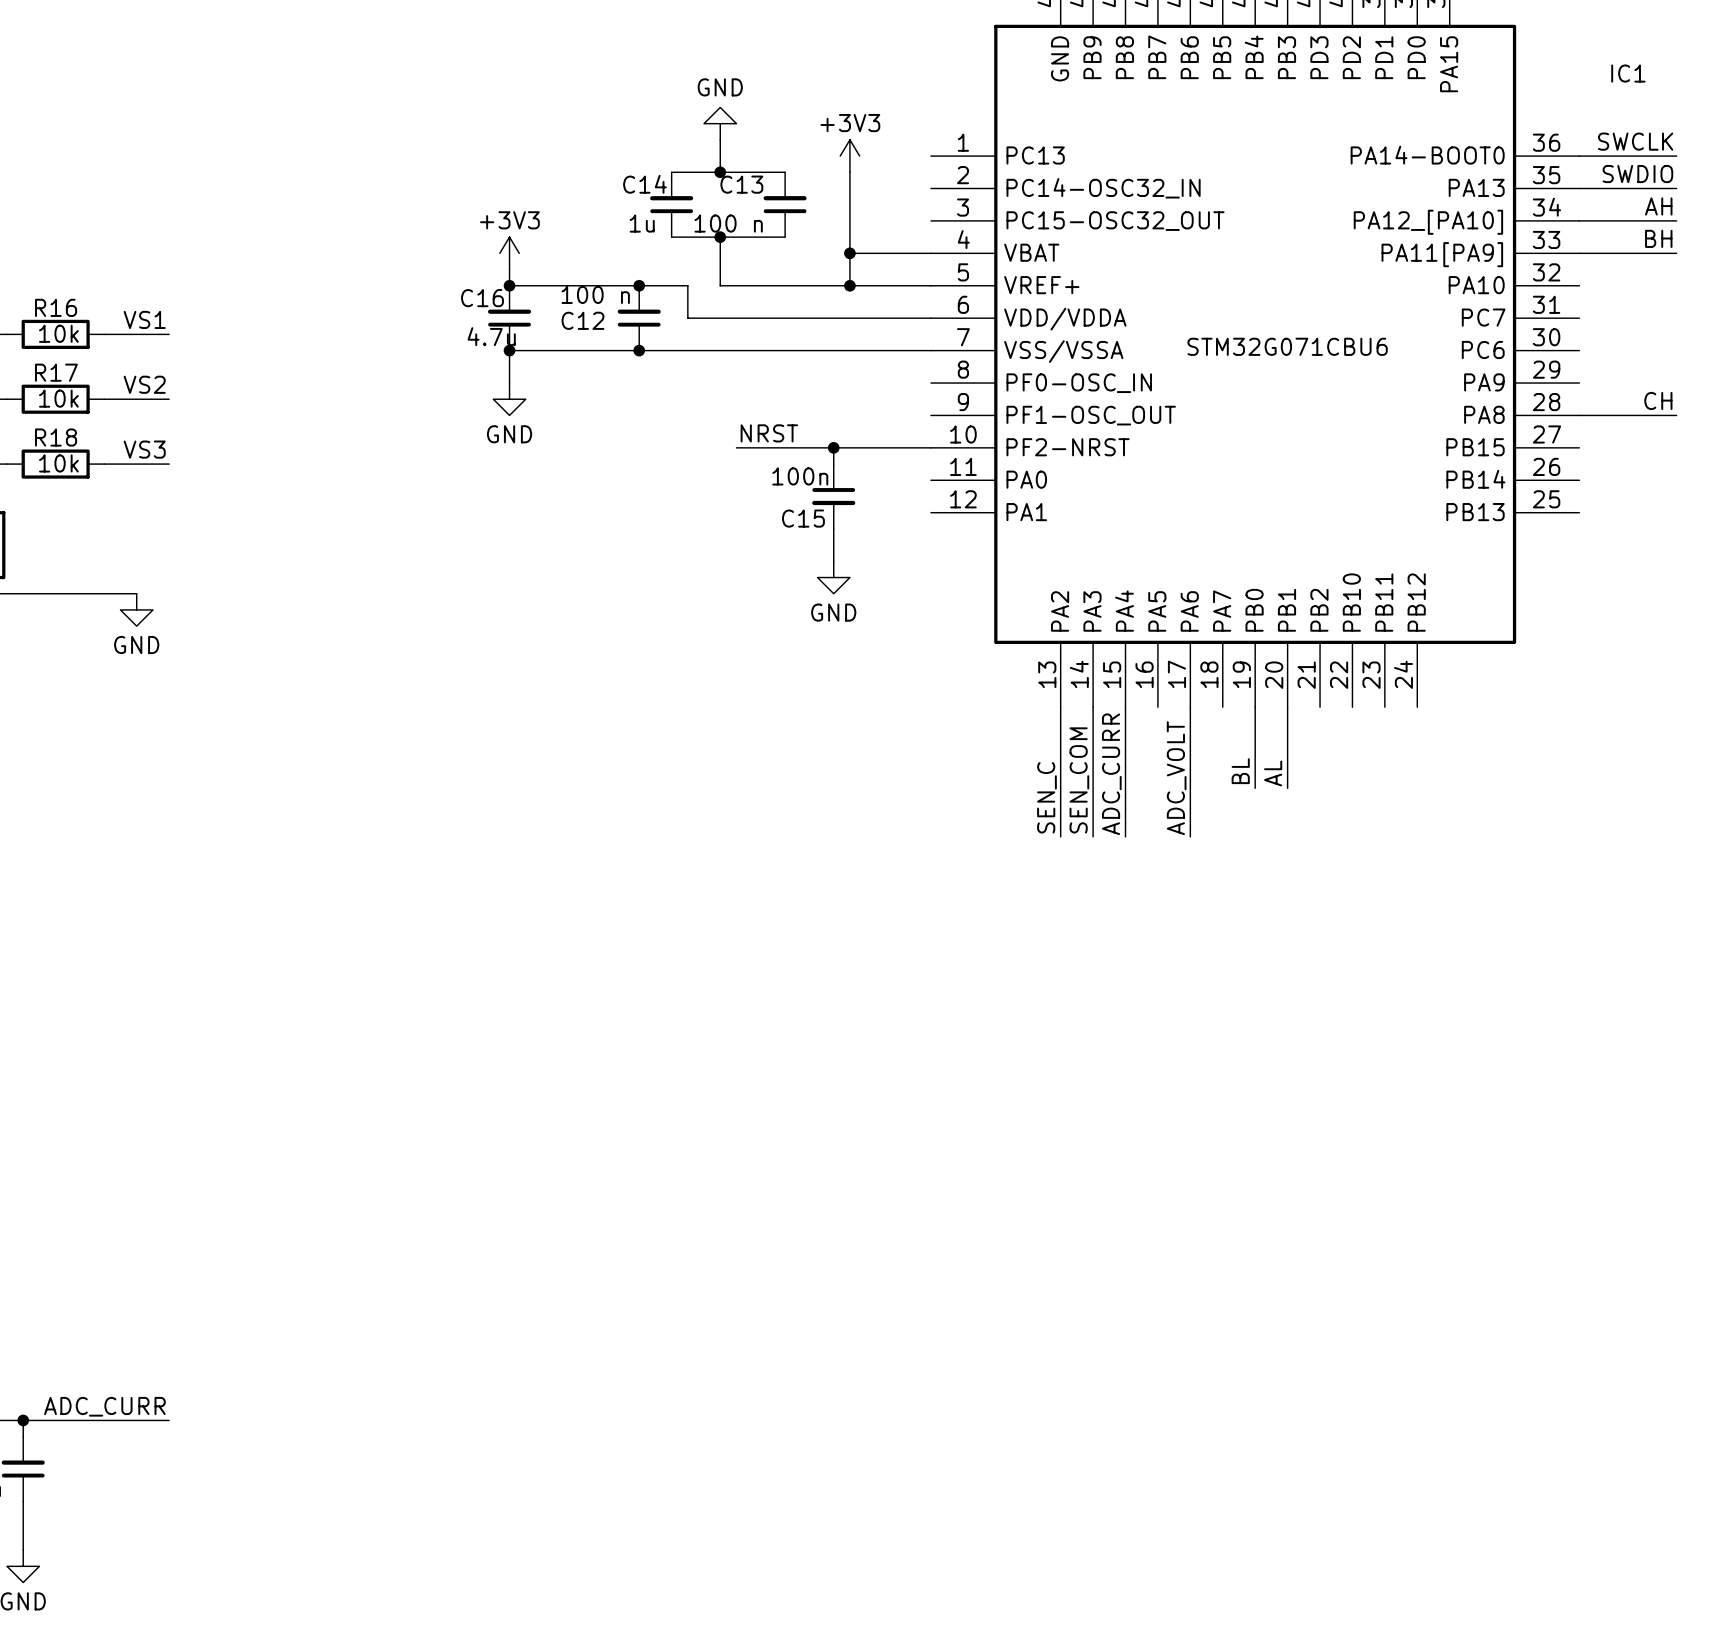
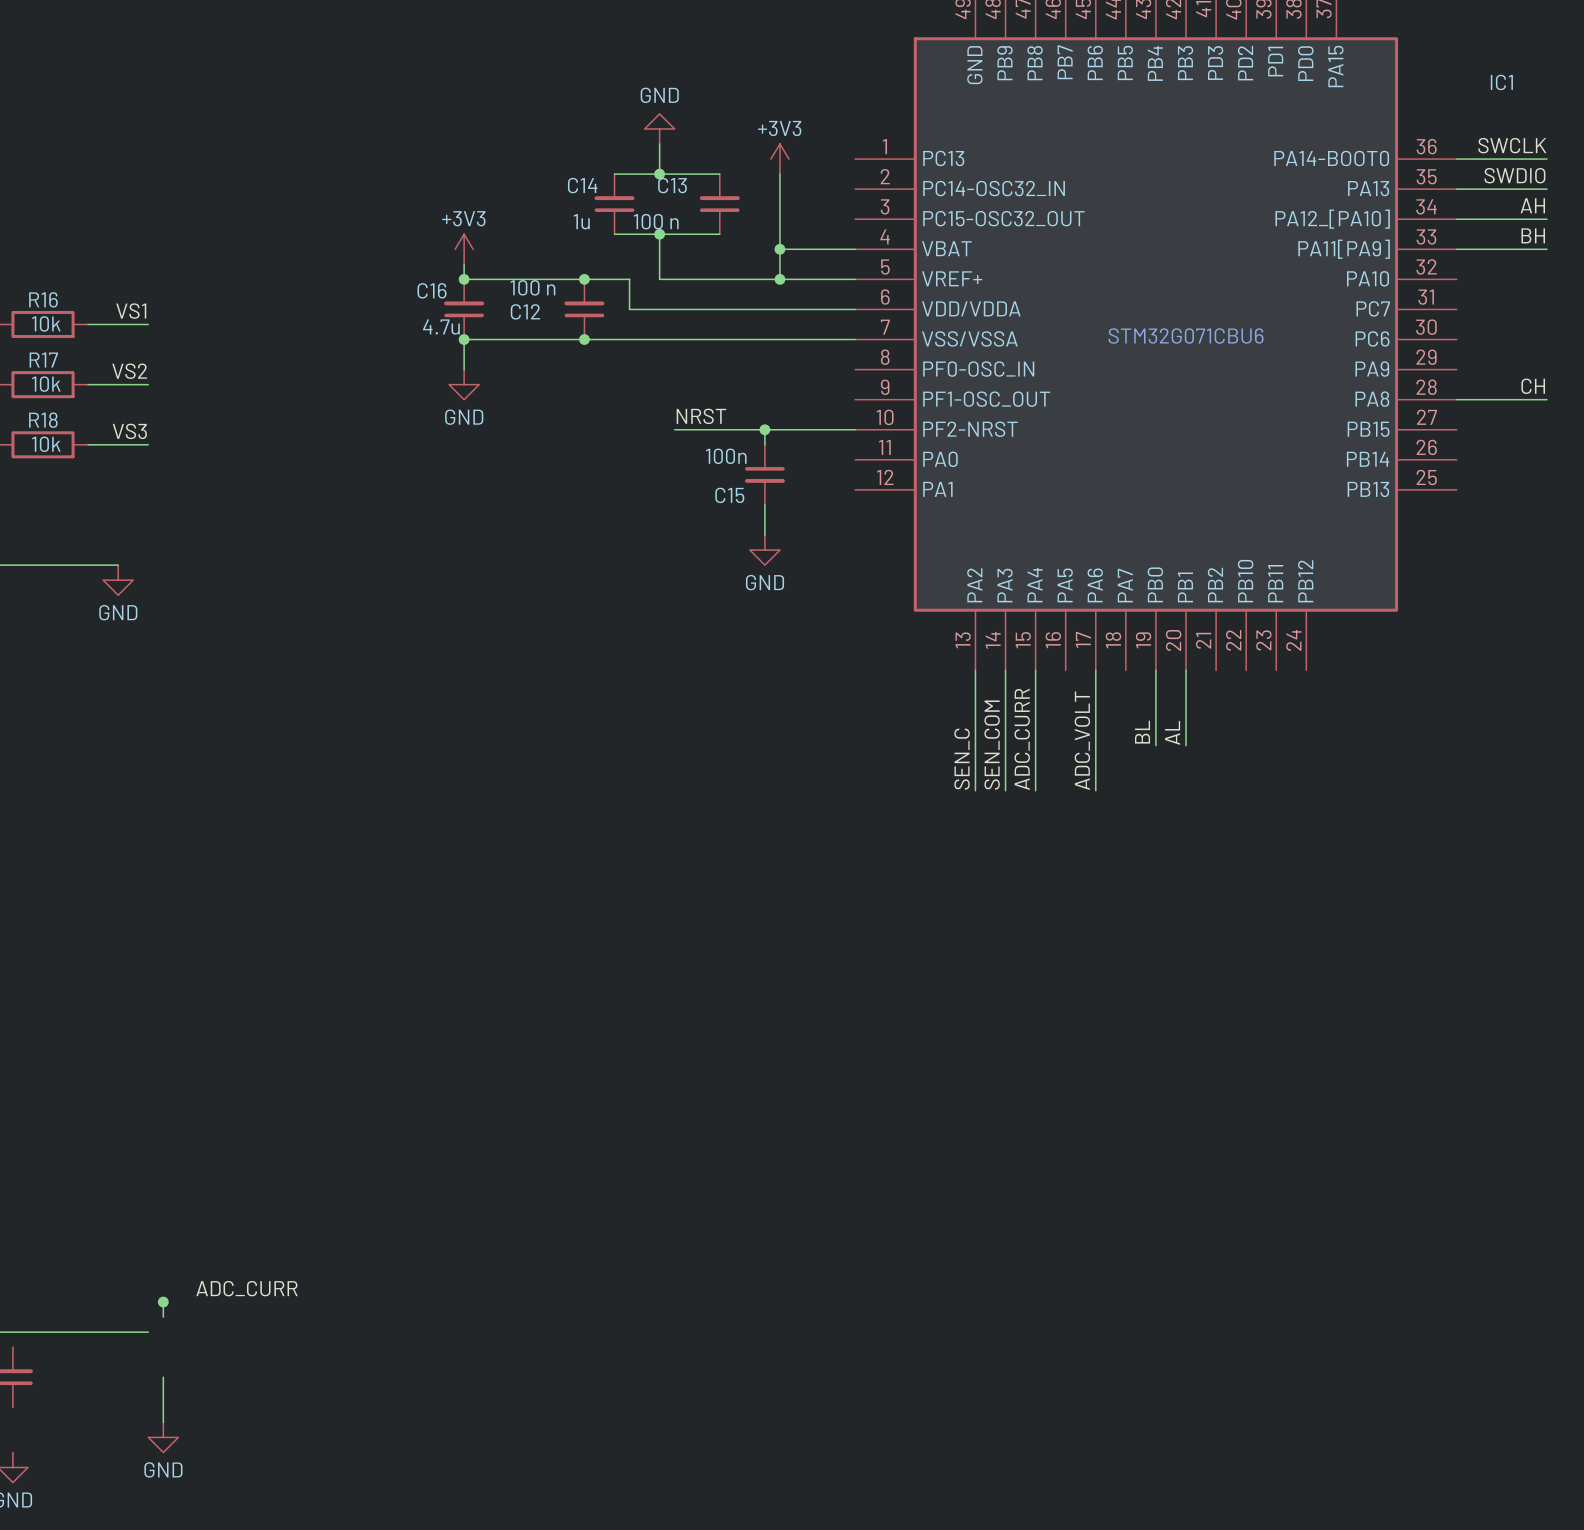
junction: none -> (163, 1302)
label position: ADC_CURR (104, 1406) -> ADC_CURR (246, 1288)
wire: (23, 1420) (23, 1436) -> (163, 1302) (163, 1317)
junction: (23, 1420) -> none
wire: (23, 1501) (23, 1550) -> (163, 1377) (163, 1422)
power symbol: none -> GND (163, 1437)

